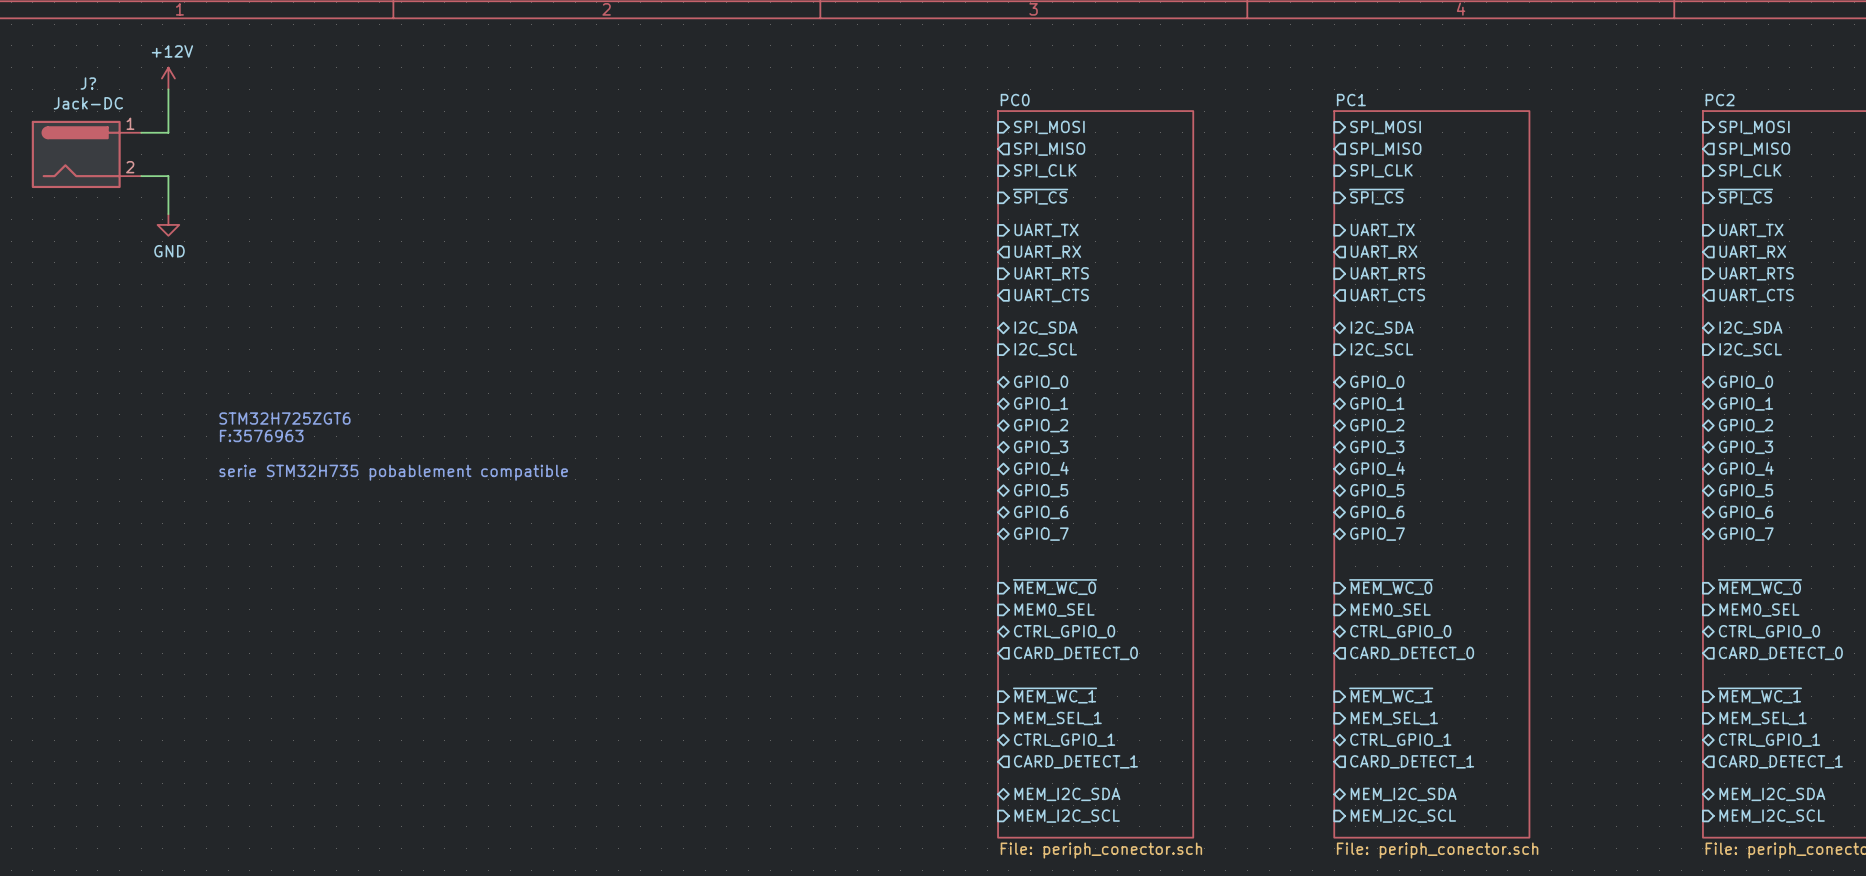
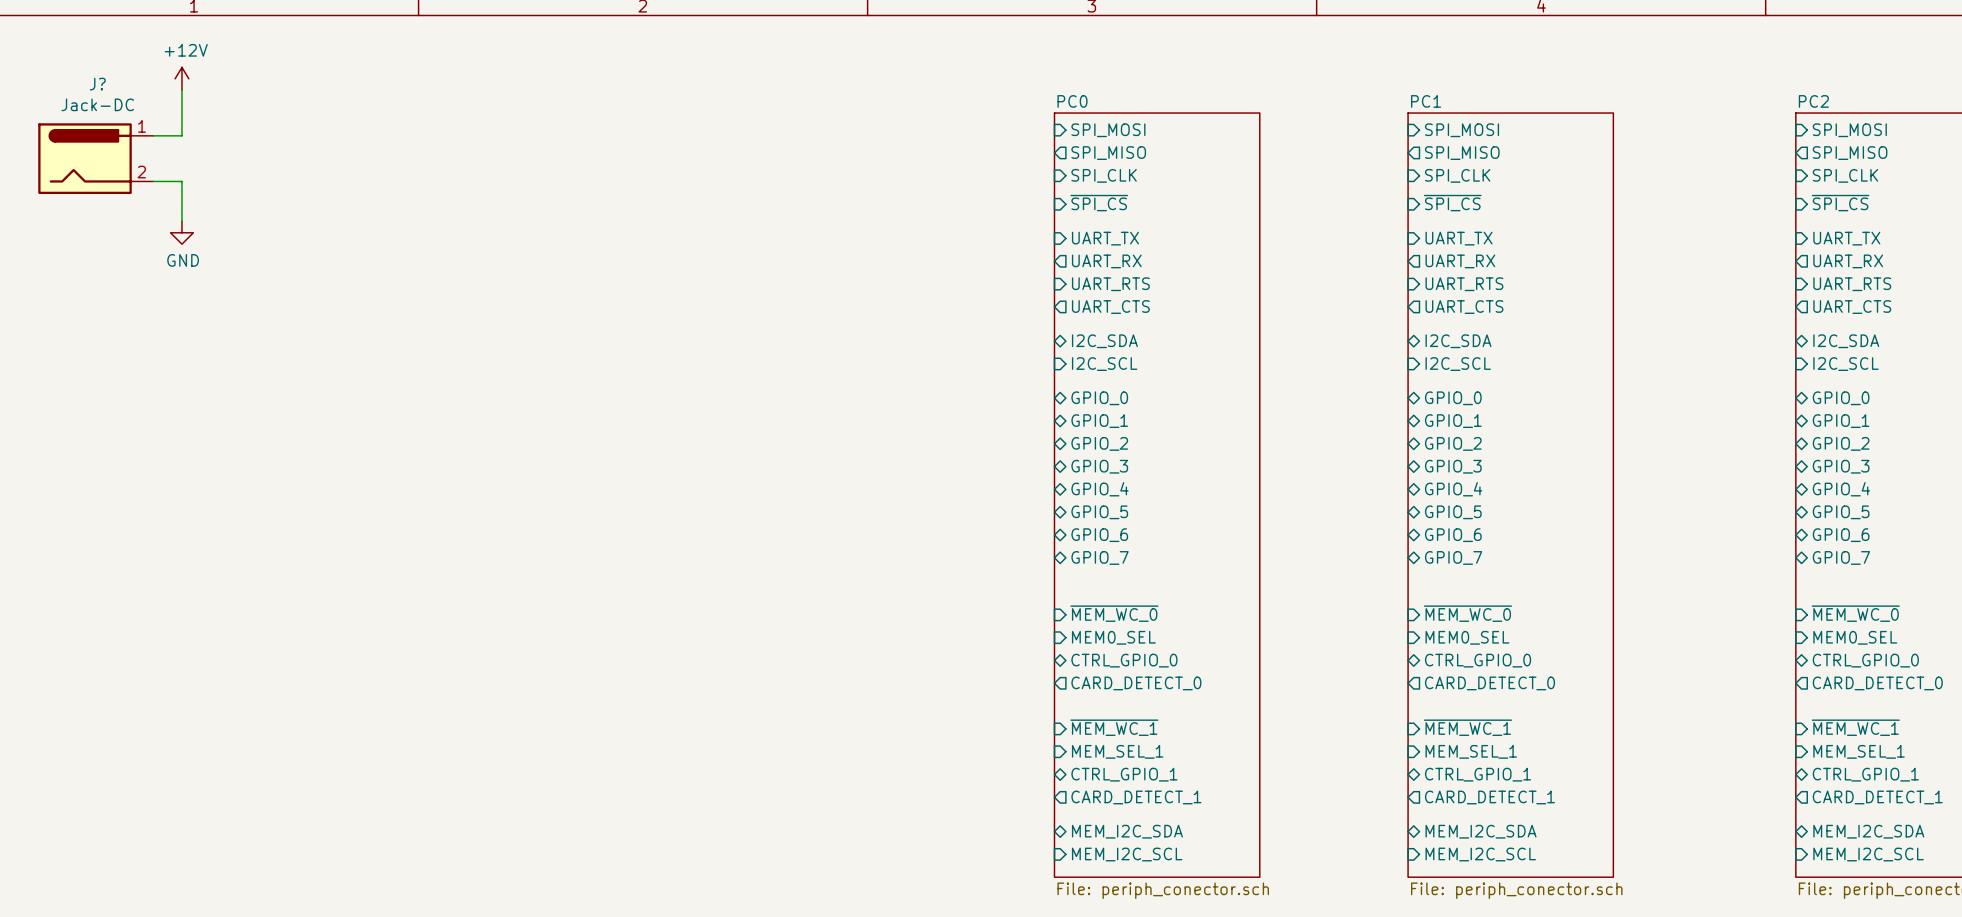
text: STM32H725ZGT6 (284, 418) -> none
text: F:3576963 (261, 435) -> none
text: serie STM32H735 pobablement compatible (393, 472) -> none

